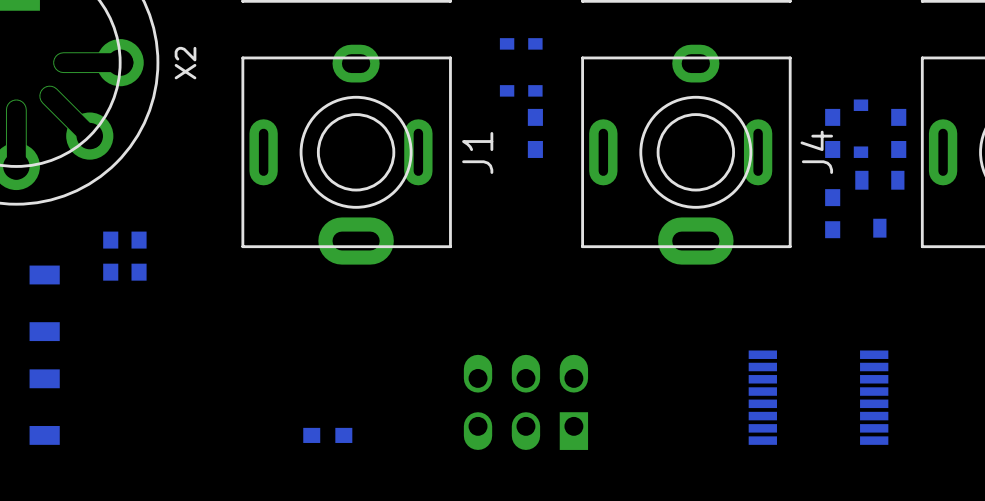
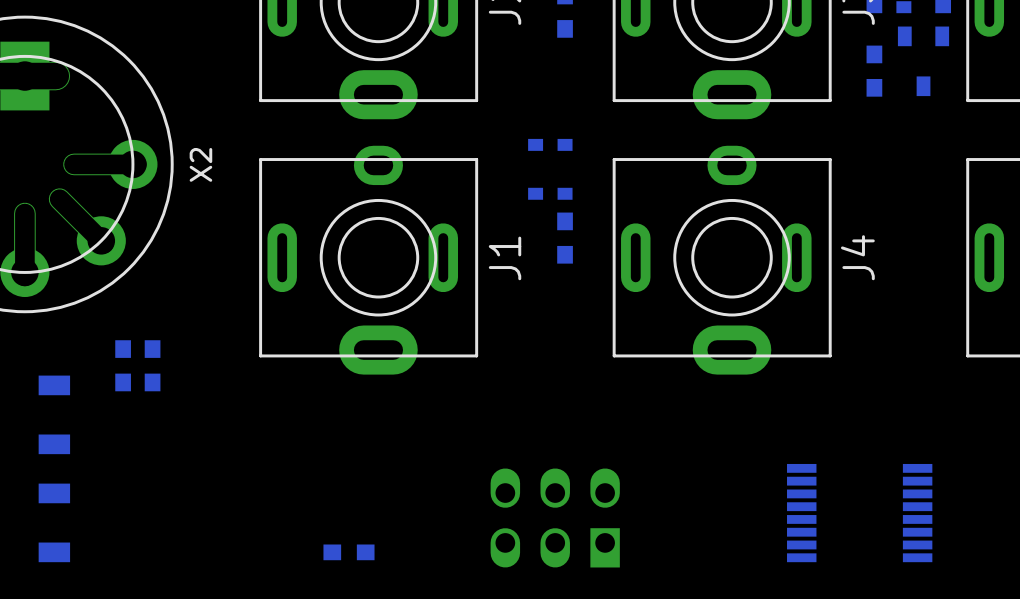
part: (860, 128) -> none
part: (832, 133) -> none
part: (898, 133) -> none
part: (879, 204) -> none
part: (832, 213) -> none

